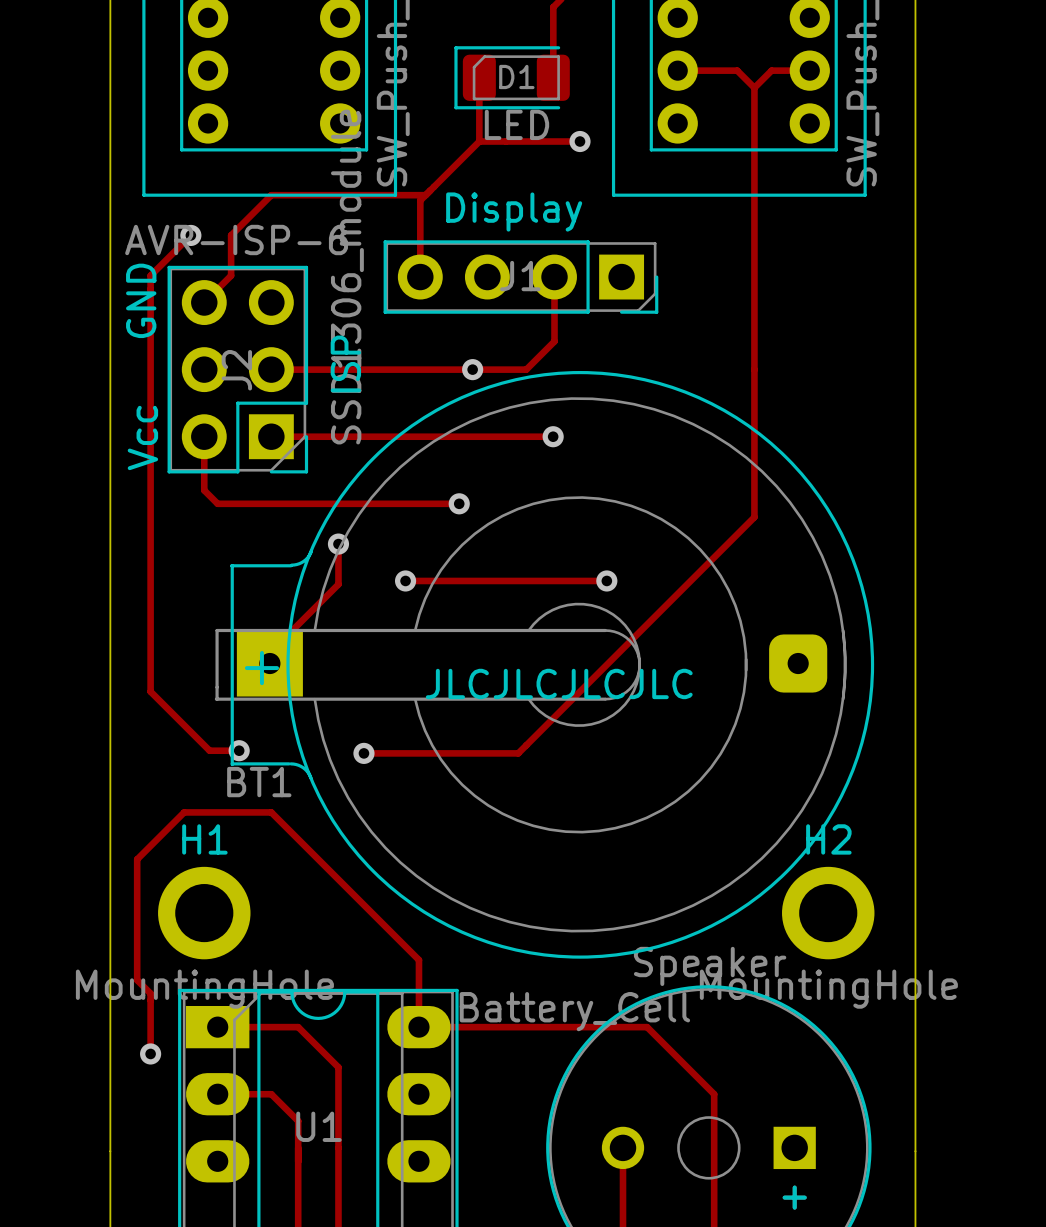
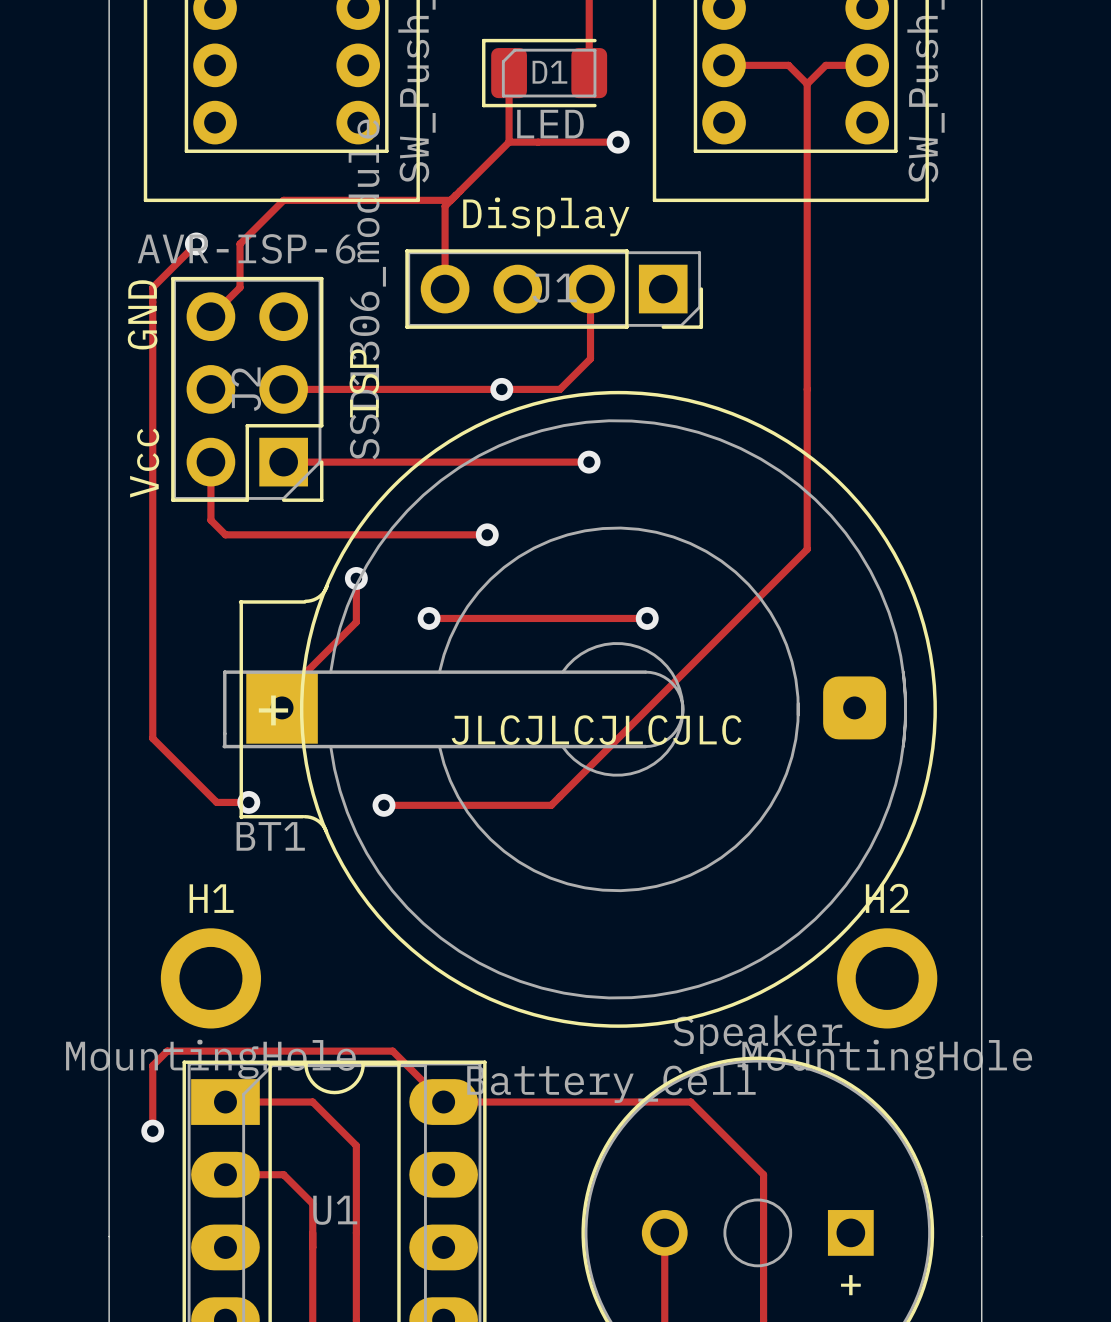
track: (150, 993) (137, 980) (137, 859) (184, 812) (271, 812) (418, 960) (418, 1027) -> (152, 1065) (167, 1051) (392, 1051) (443, 1102)

